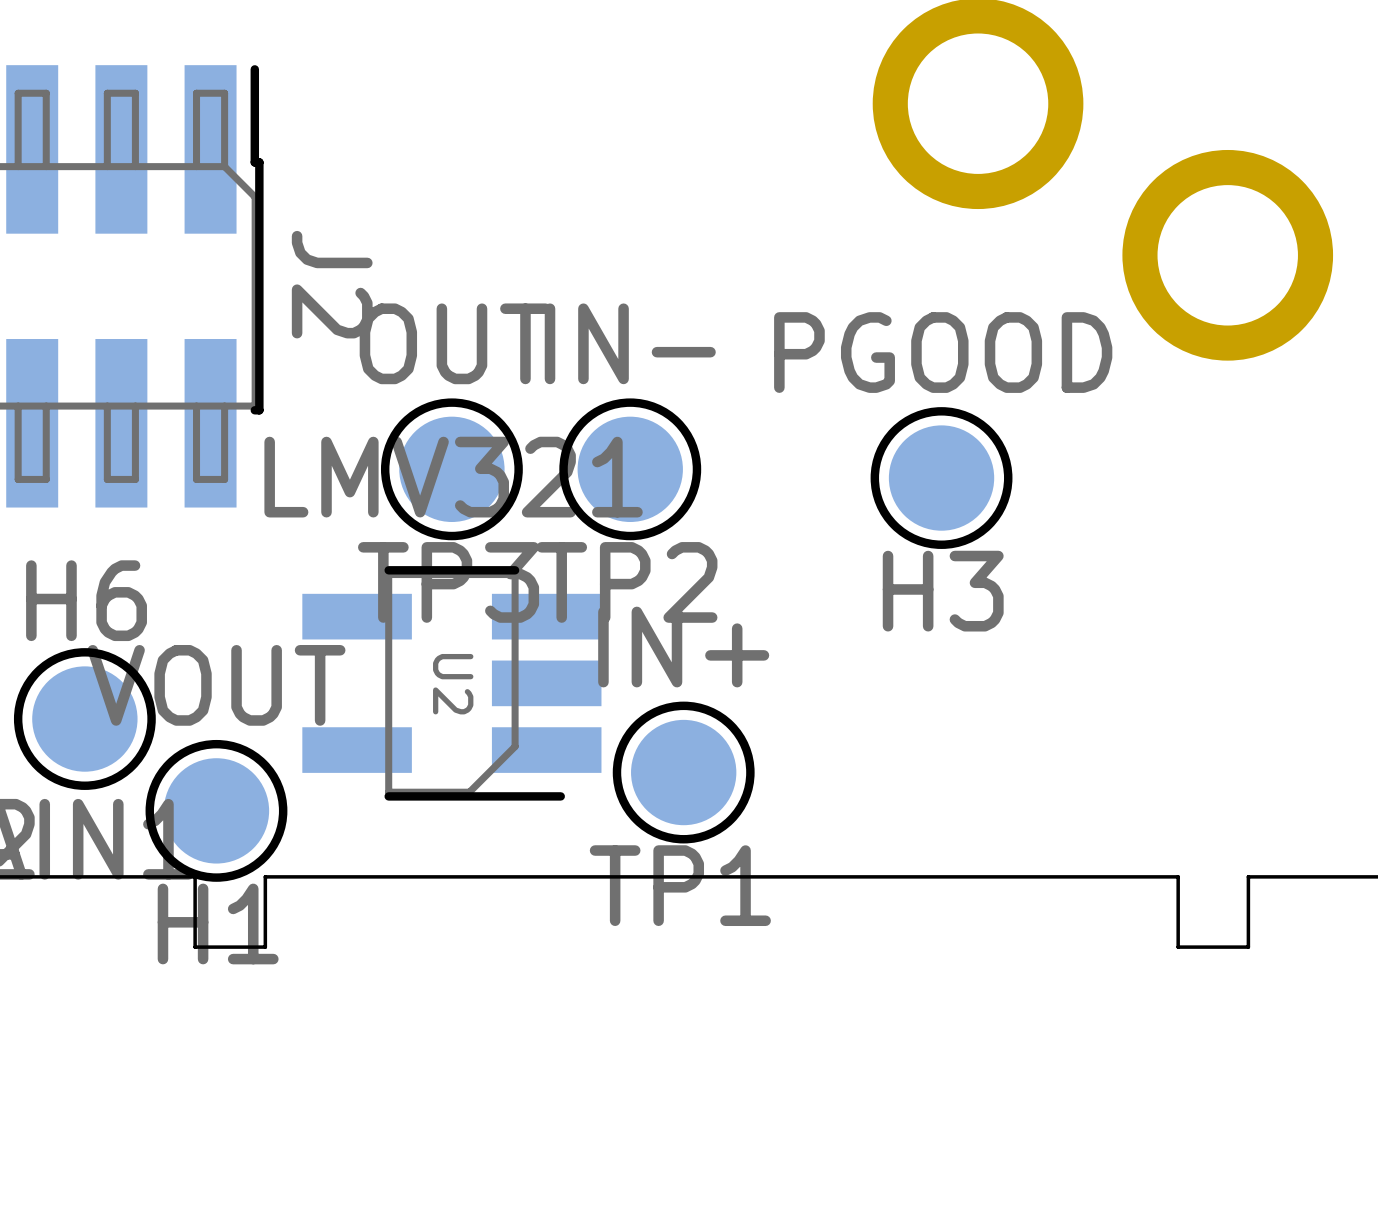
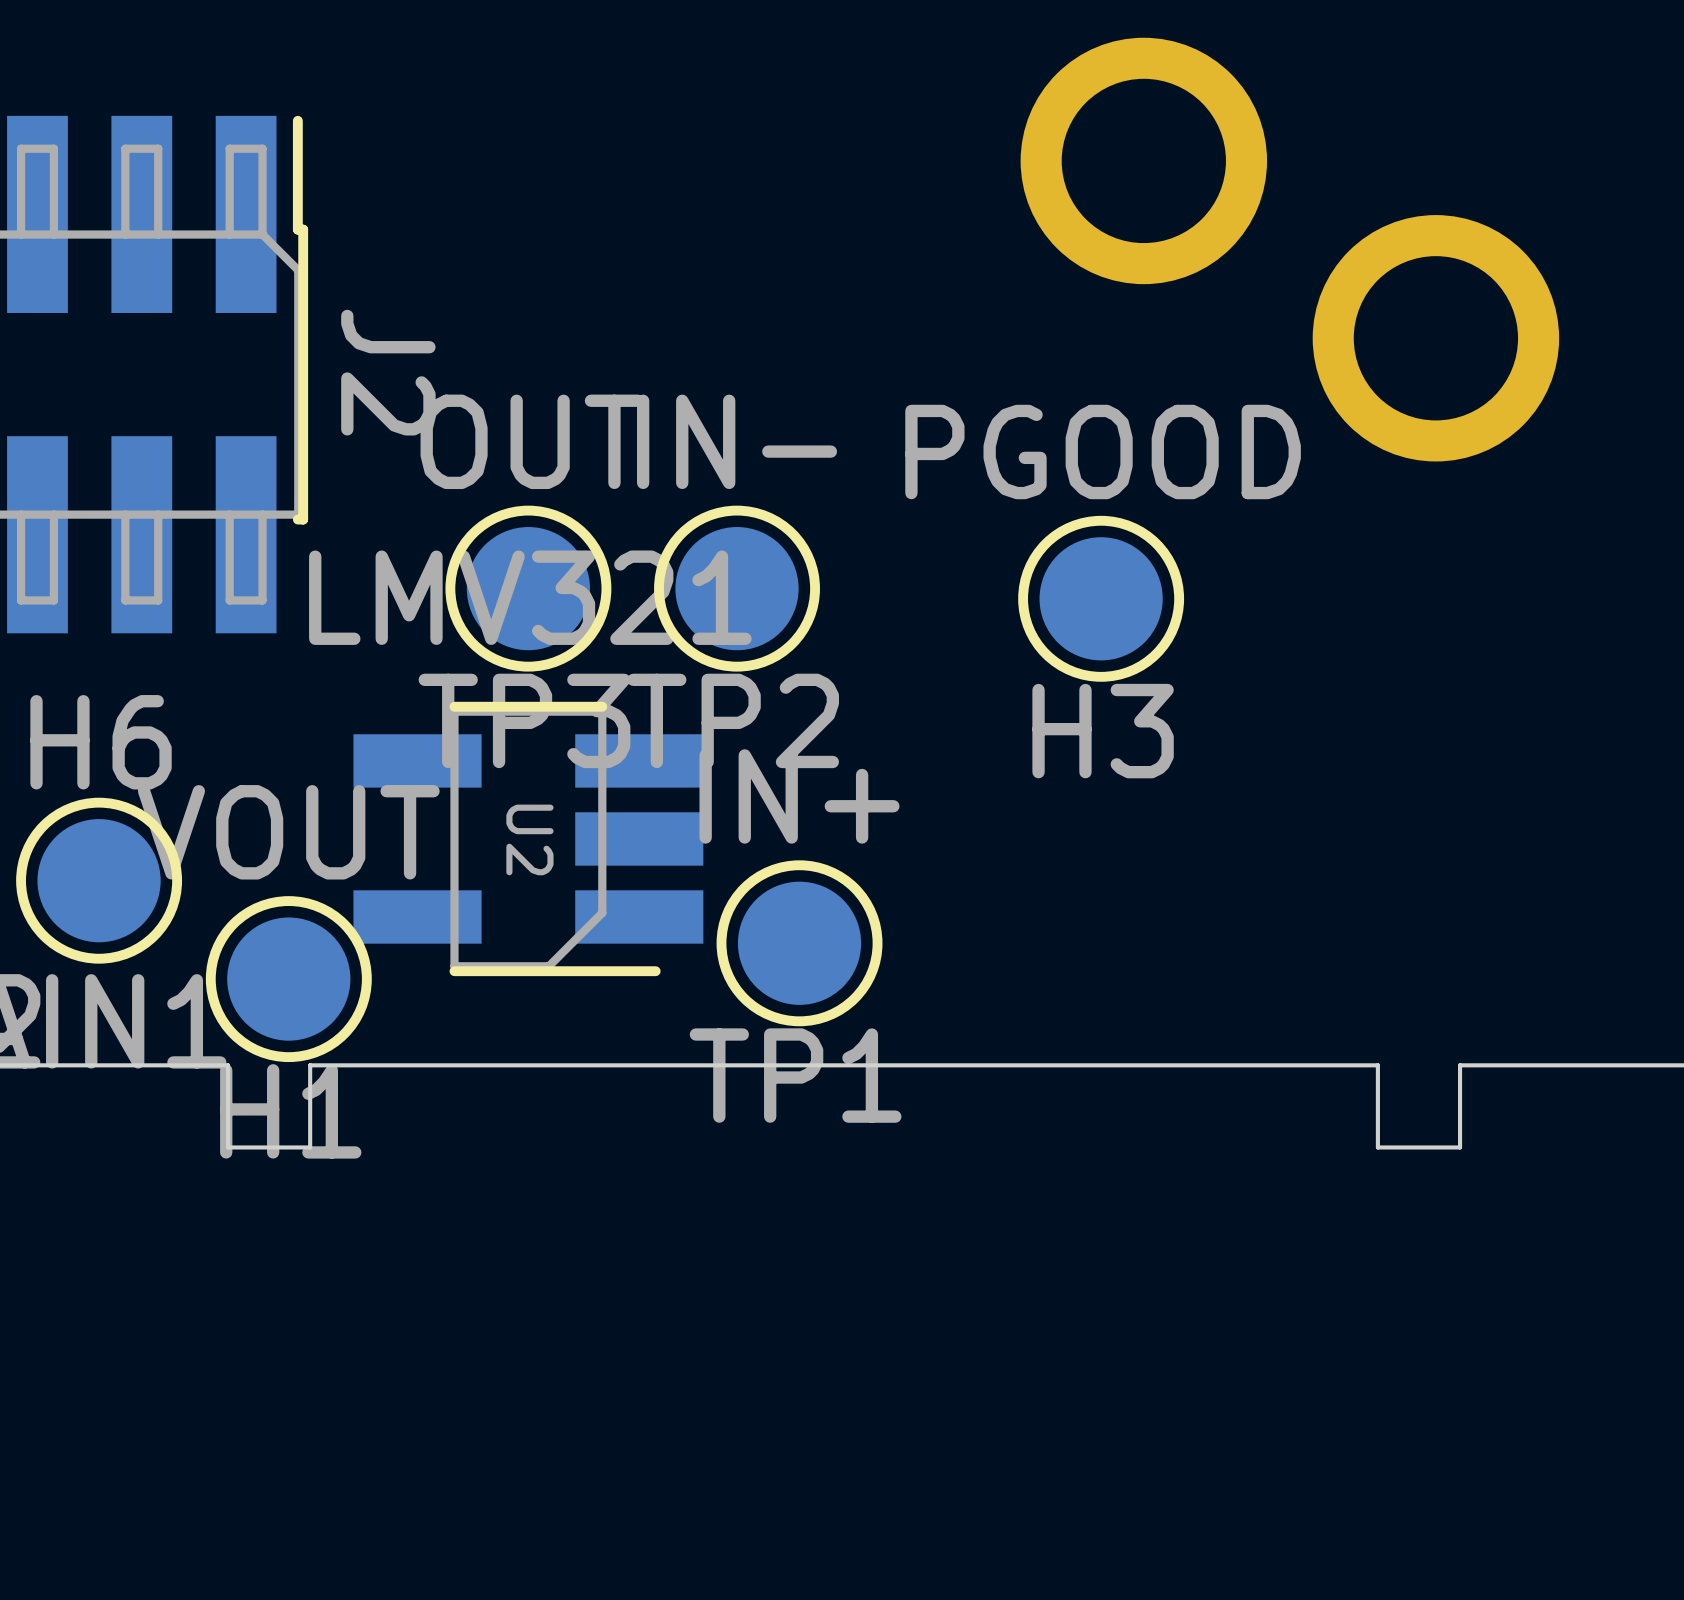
H1 position: (216, 810) -> (288, 979)

